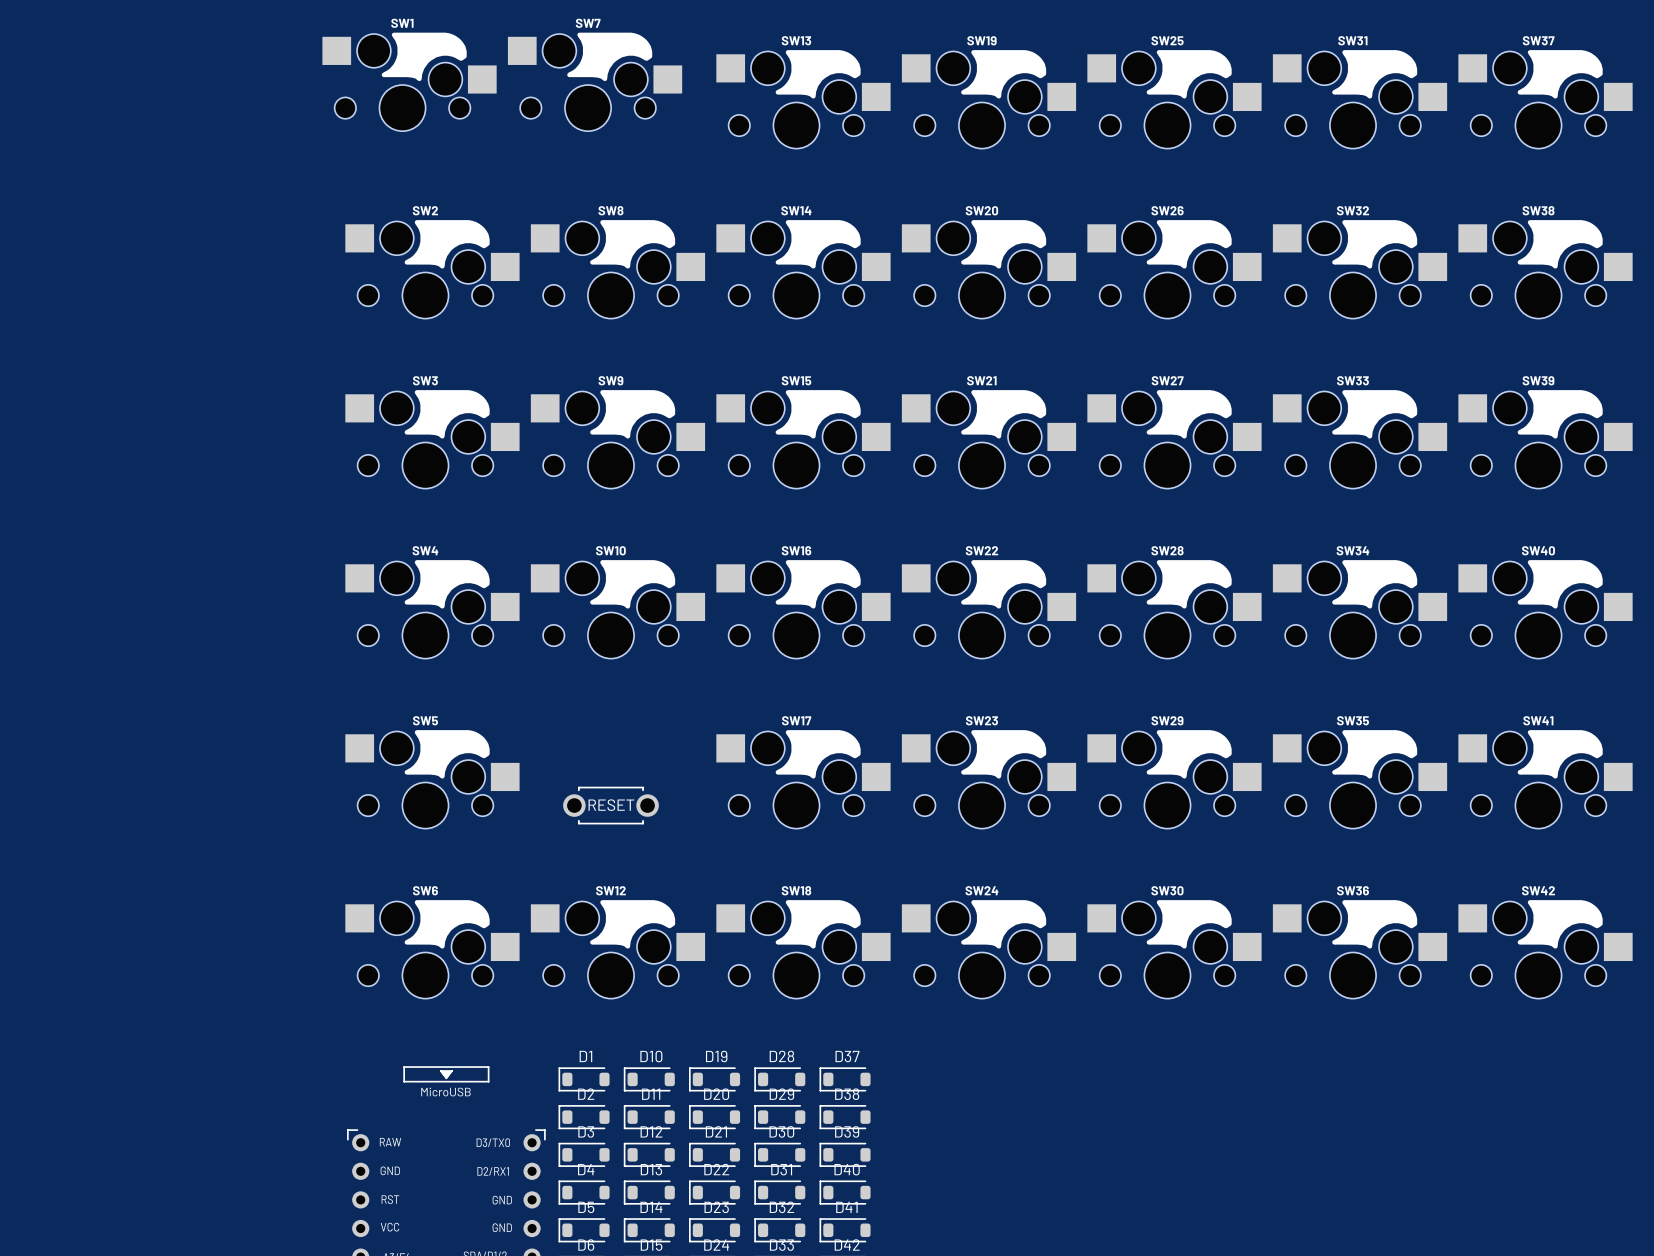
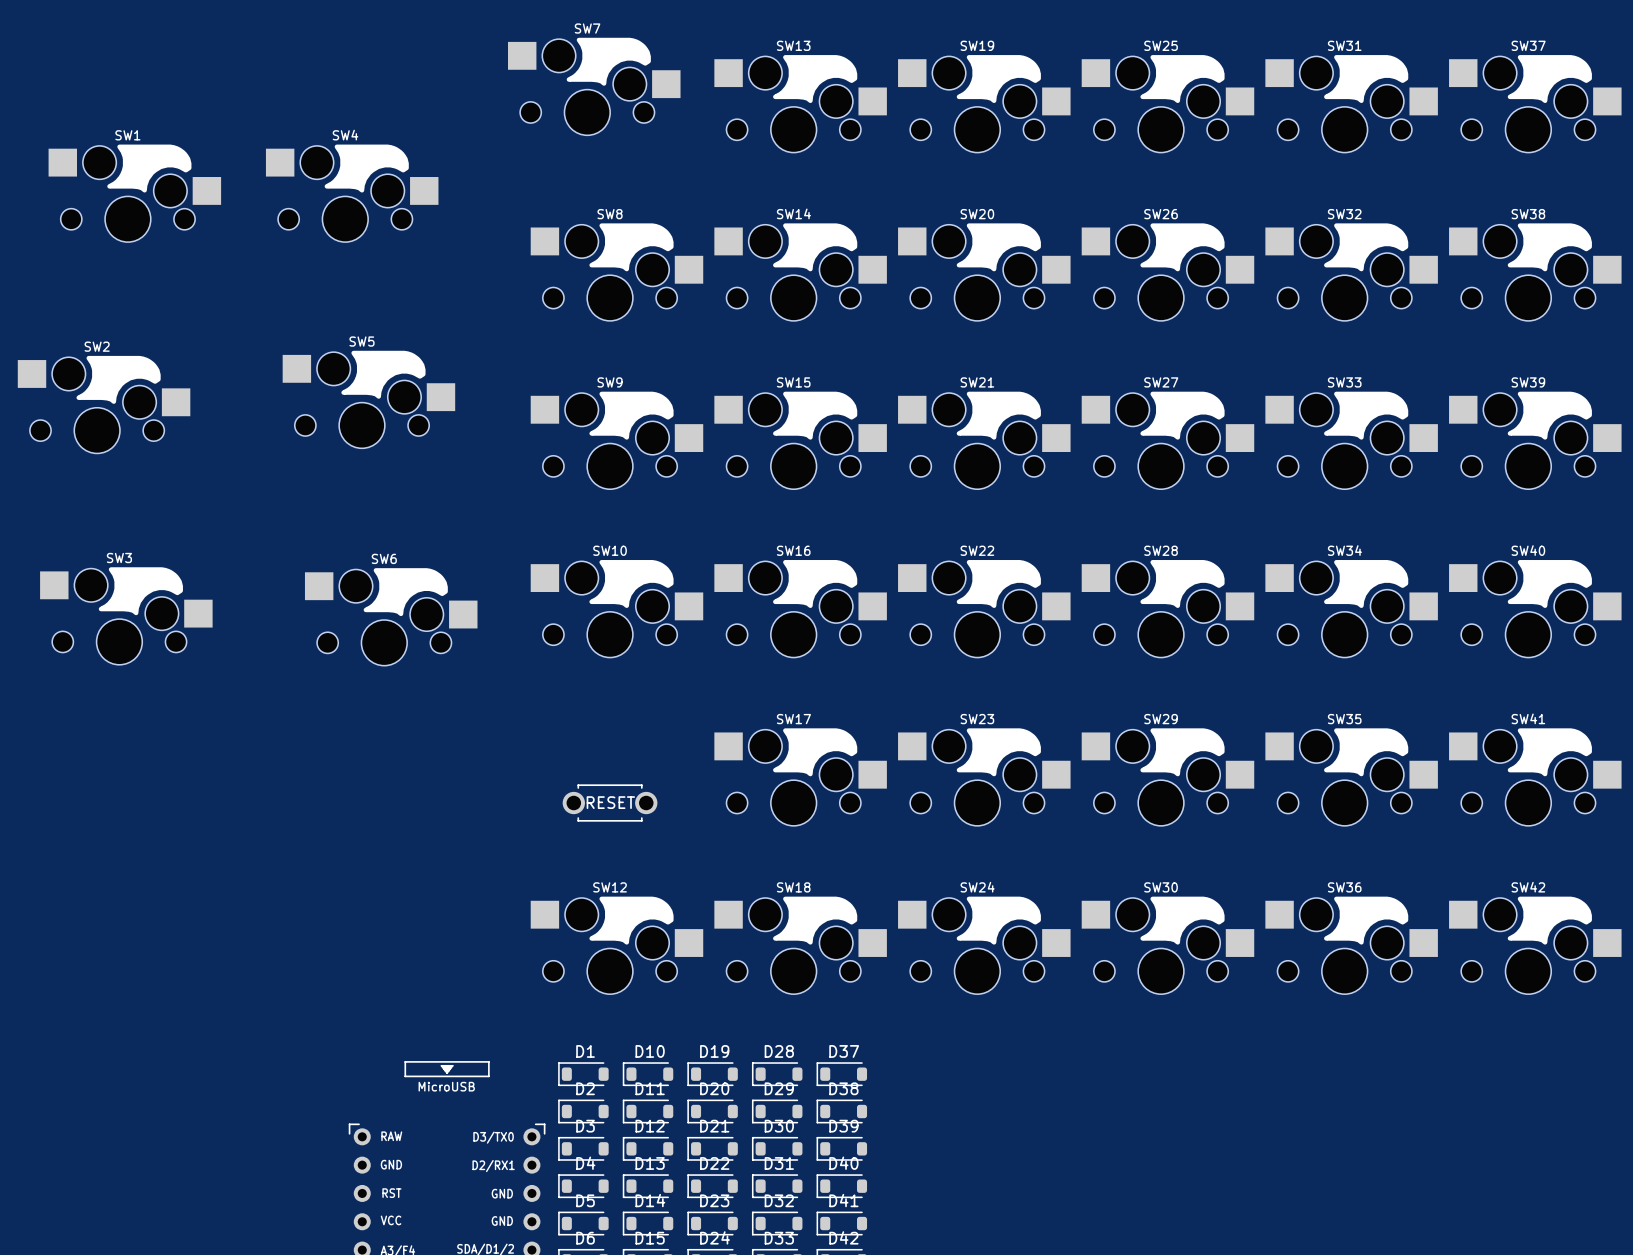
SW1 position: (409, 81) -> (134, 193)
SW2 position: (432, 269) -> (104, 404)
SW3 position: (432, 439) -> (126, 616)
SW4 position: (432, 609) -> (352, 193)
SW5 position: (432, 779) -> (368, 399)
SW6 position: (432, 949) -> (391, 616)

